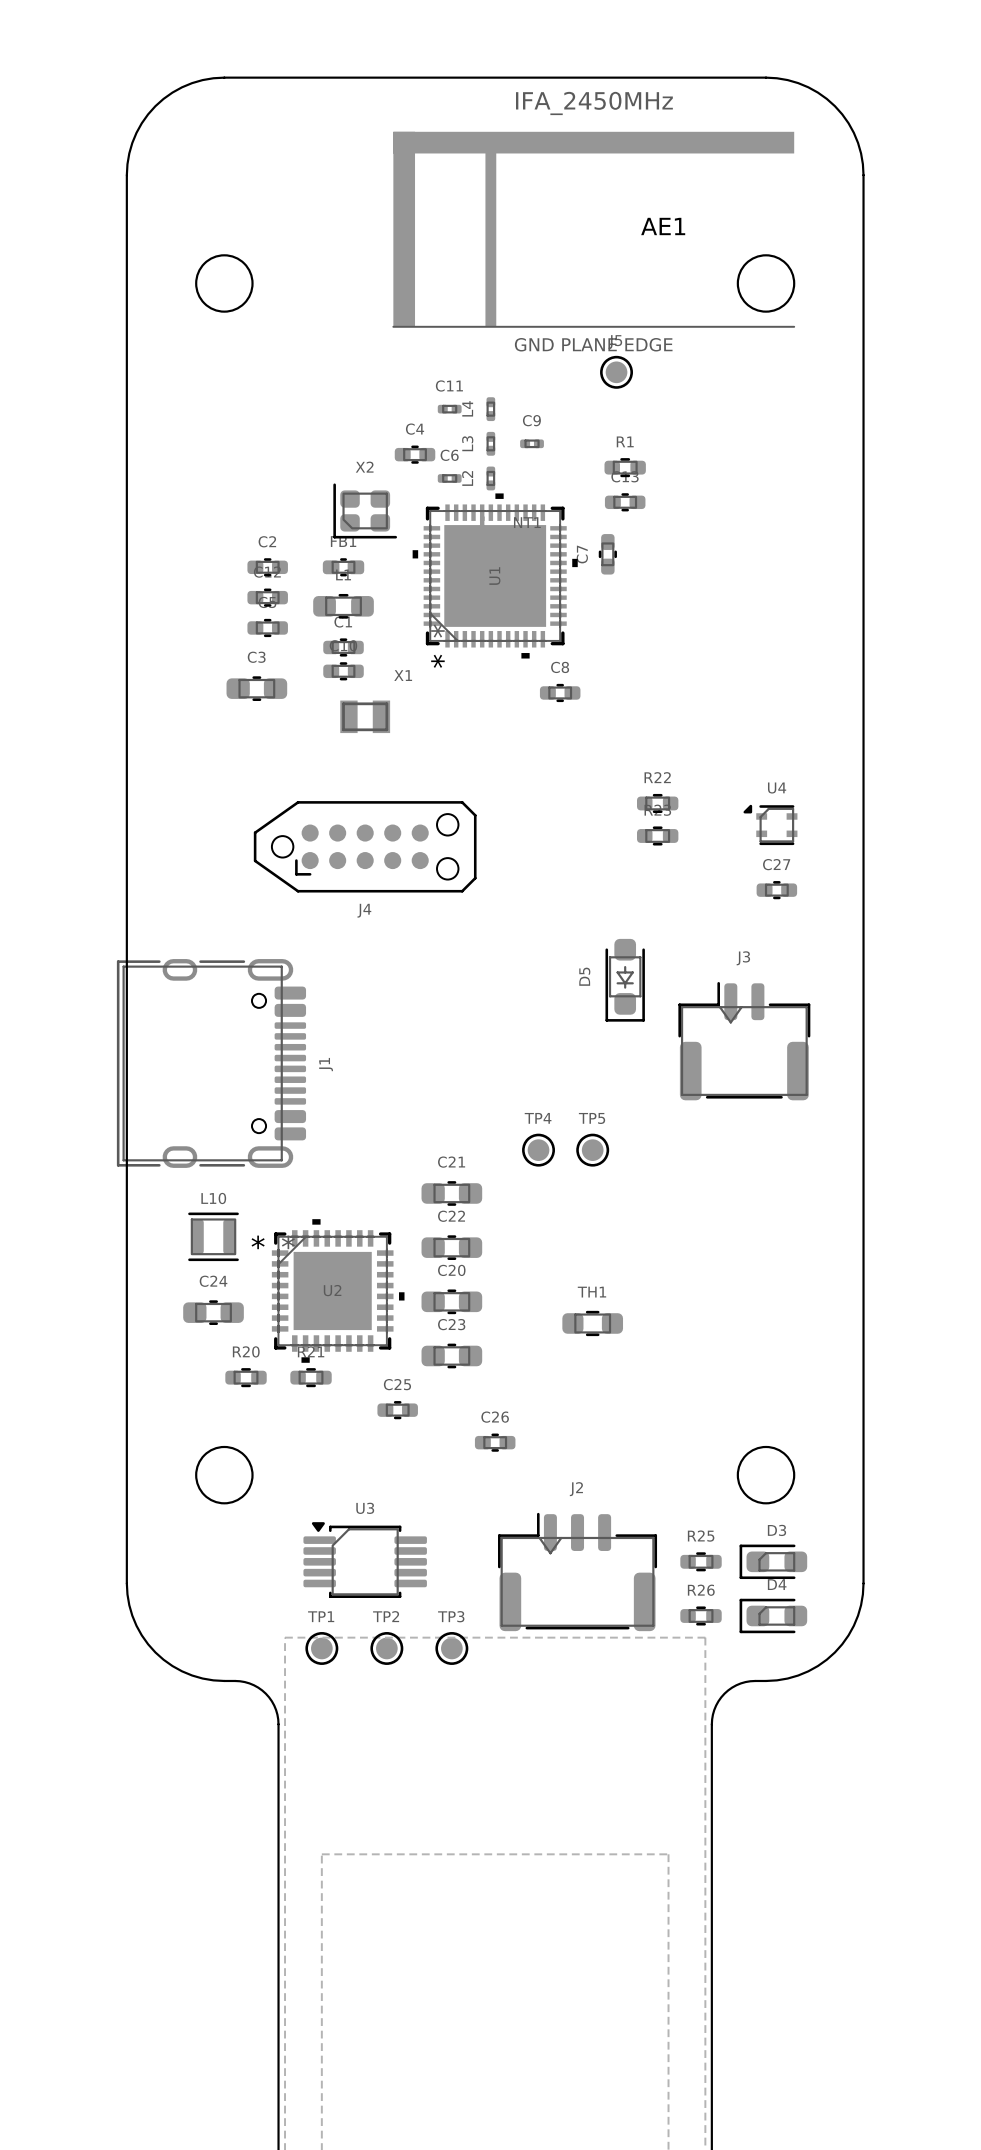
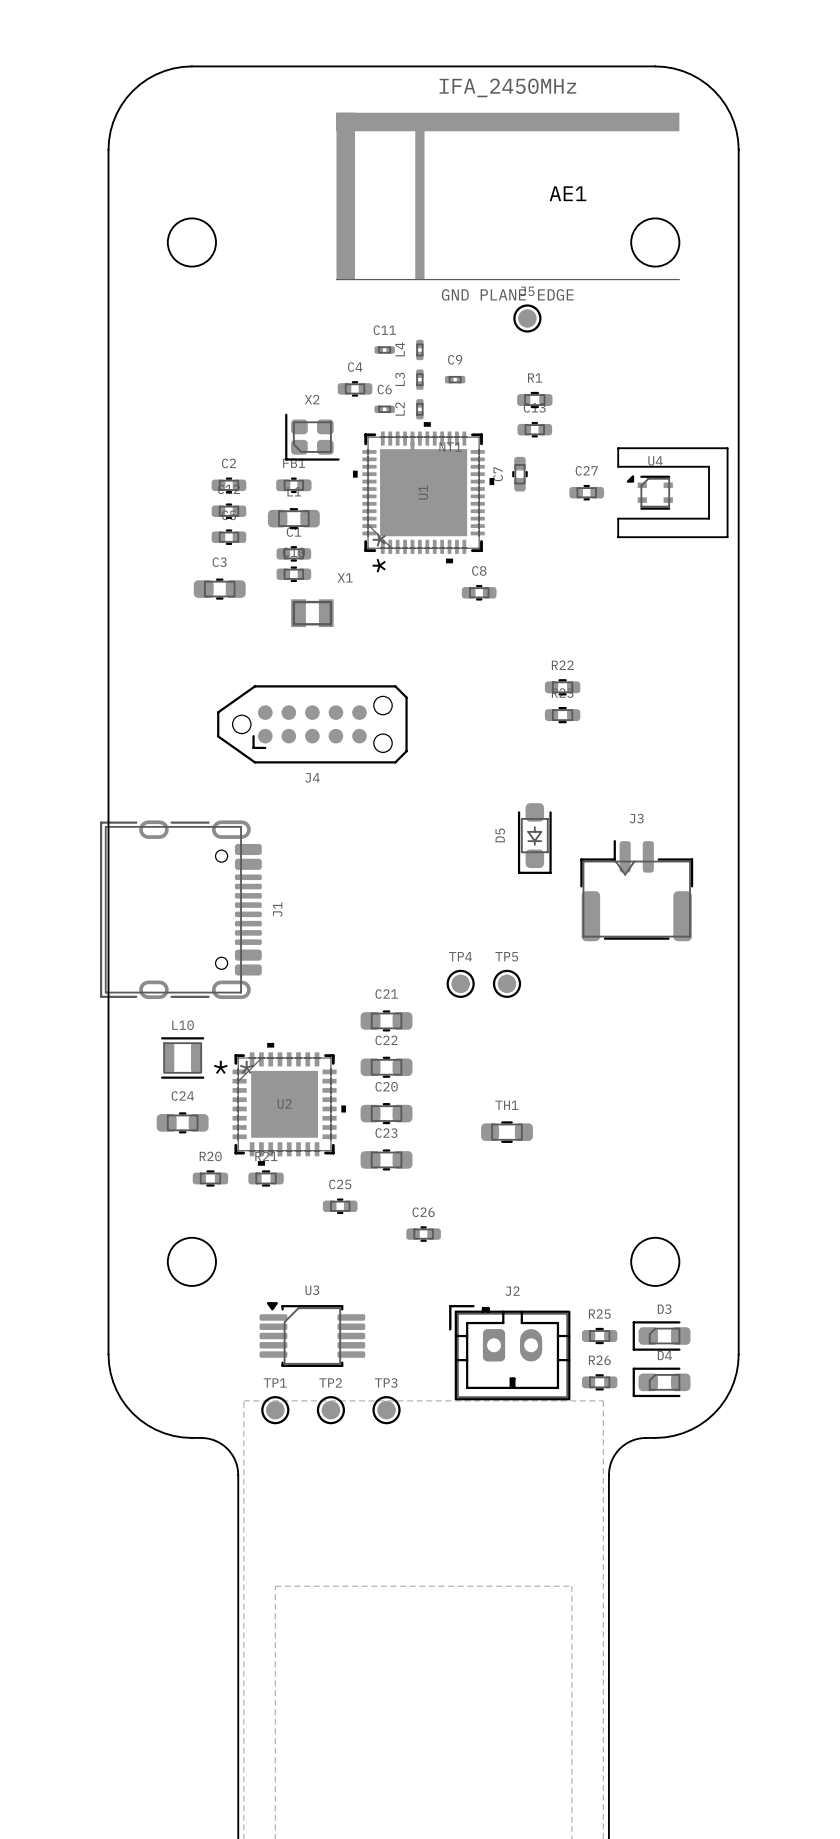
board edge: none -> (618, 448) (727, 448) (727, 537) (618, 537) (618, 518) (709, 518) (709, 466) (618, 466) (618, 448)
U4 position: (770, 824) -> (649, 492)
C27 position: (776, 890) -> (586, 492)
J2 footprint: [498, 1512, 658, 1632] -> [449, 1305, 571, 1401]

